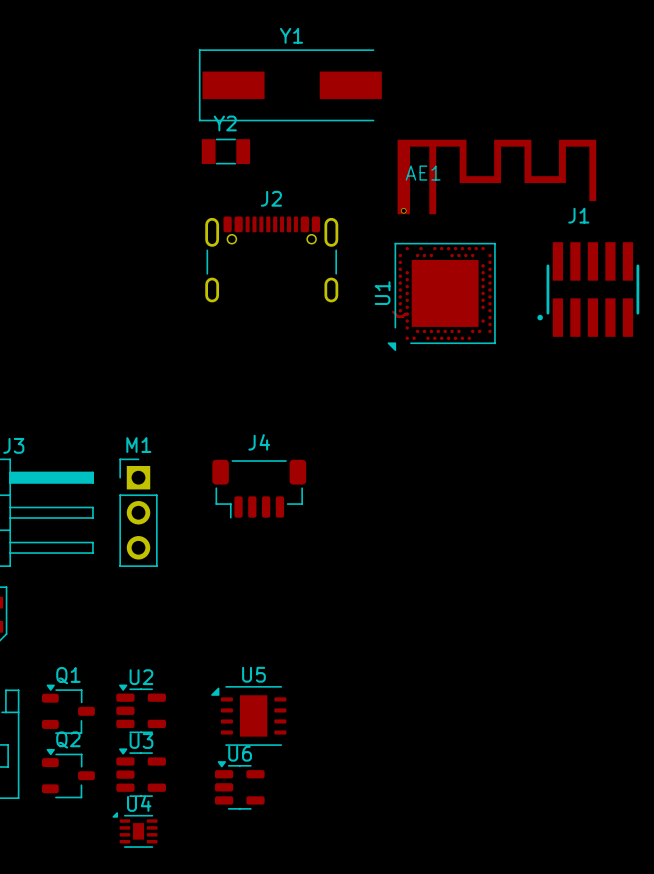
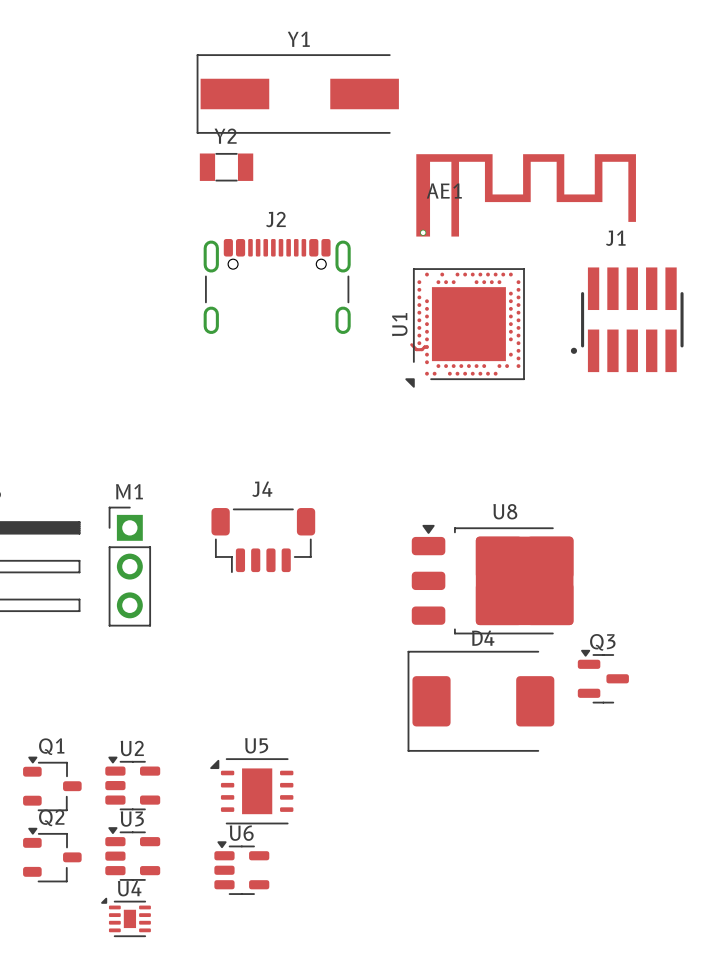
U8: none -> (492, 579)
Q3: none -> (603, 676)
D4: none -> (480, 701)

